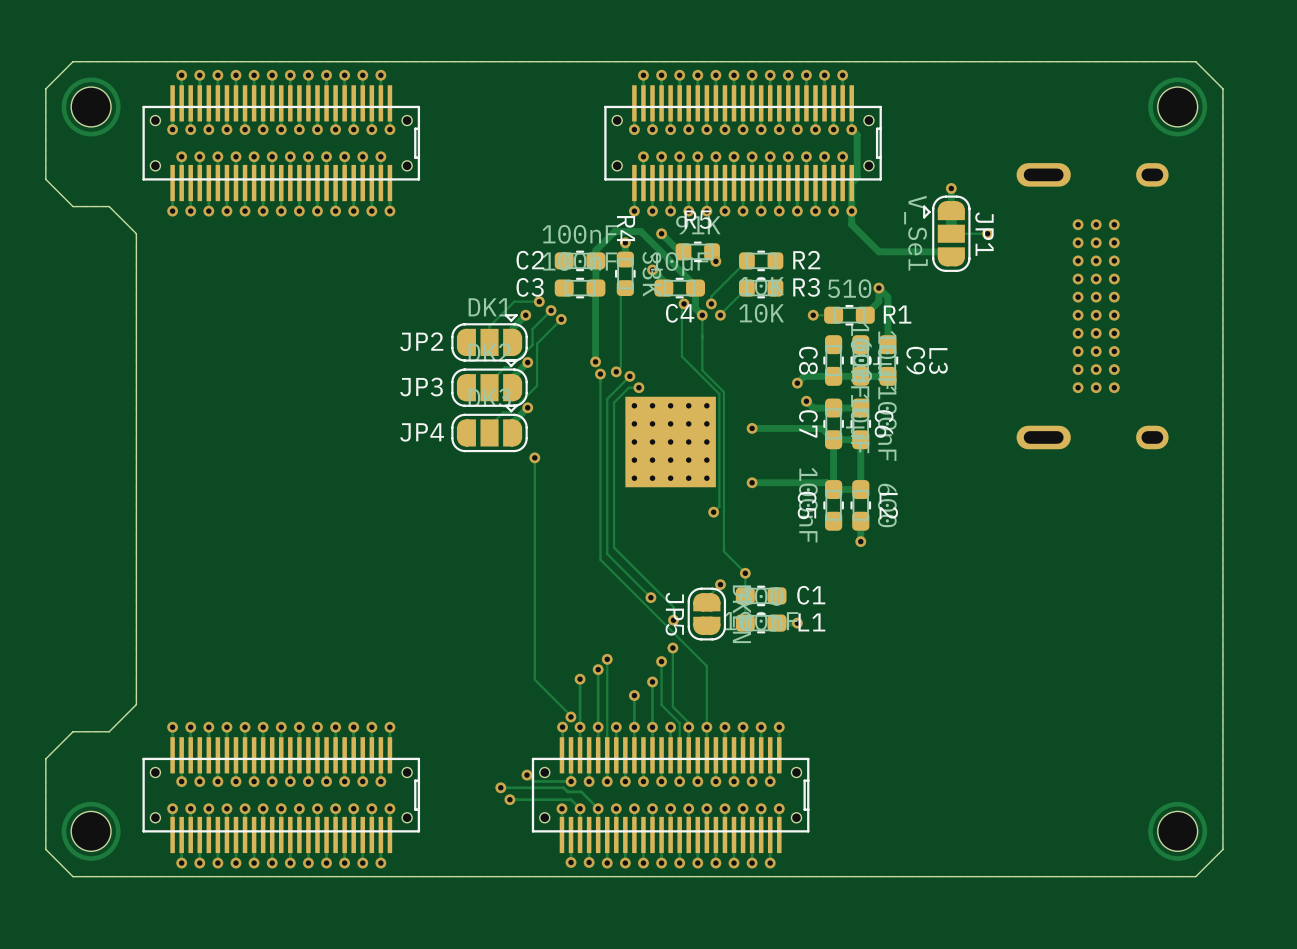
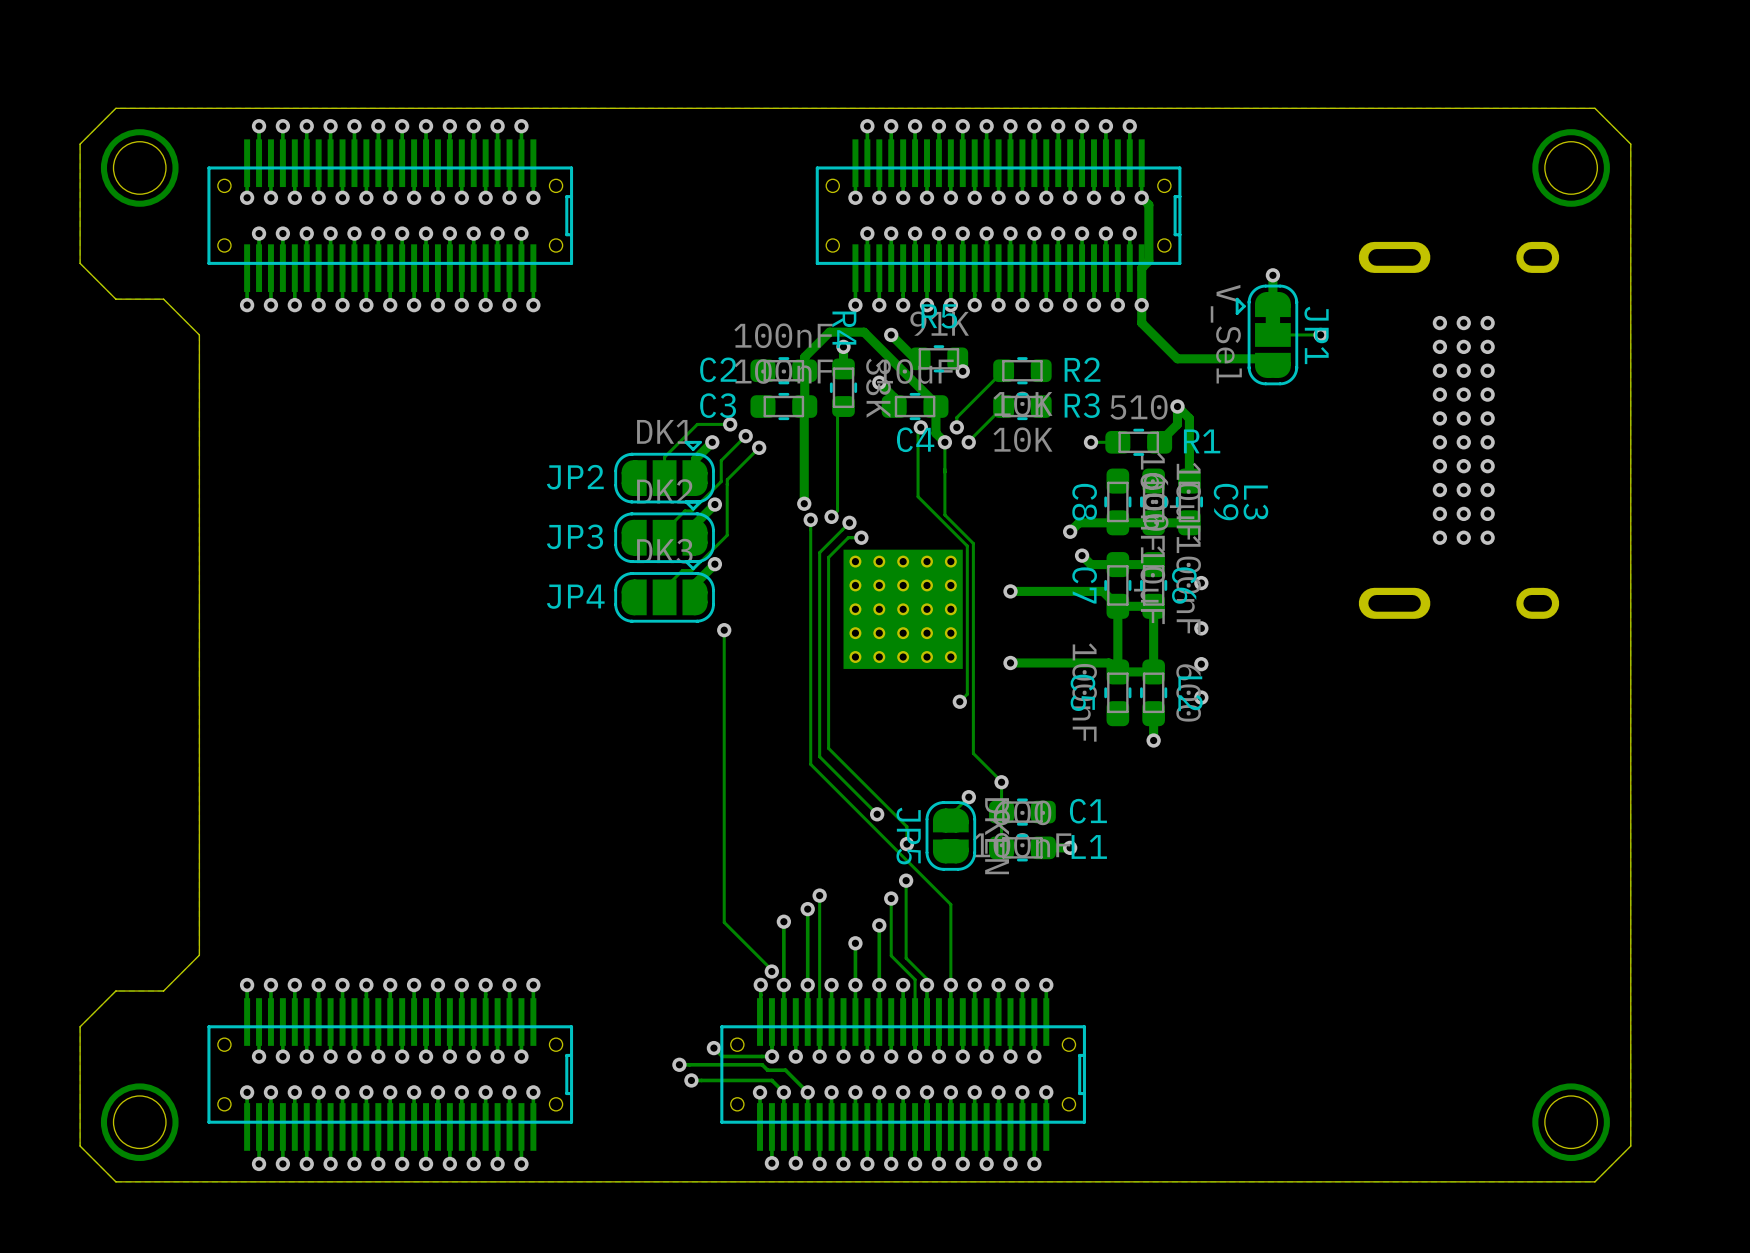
via: none -> (1201, 583)
via: none -> (1201, 628)
via: none -> (1201, 664)
via: none -> (1201, 697)

